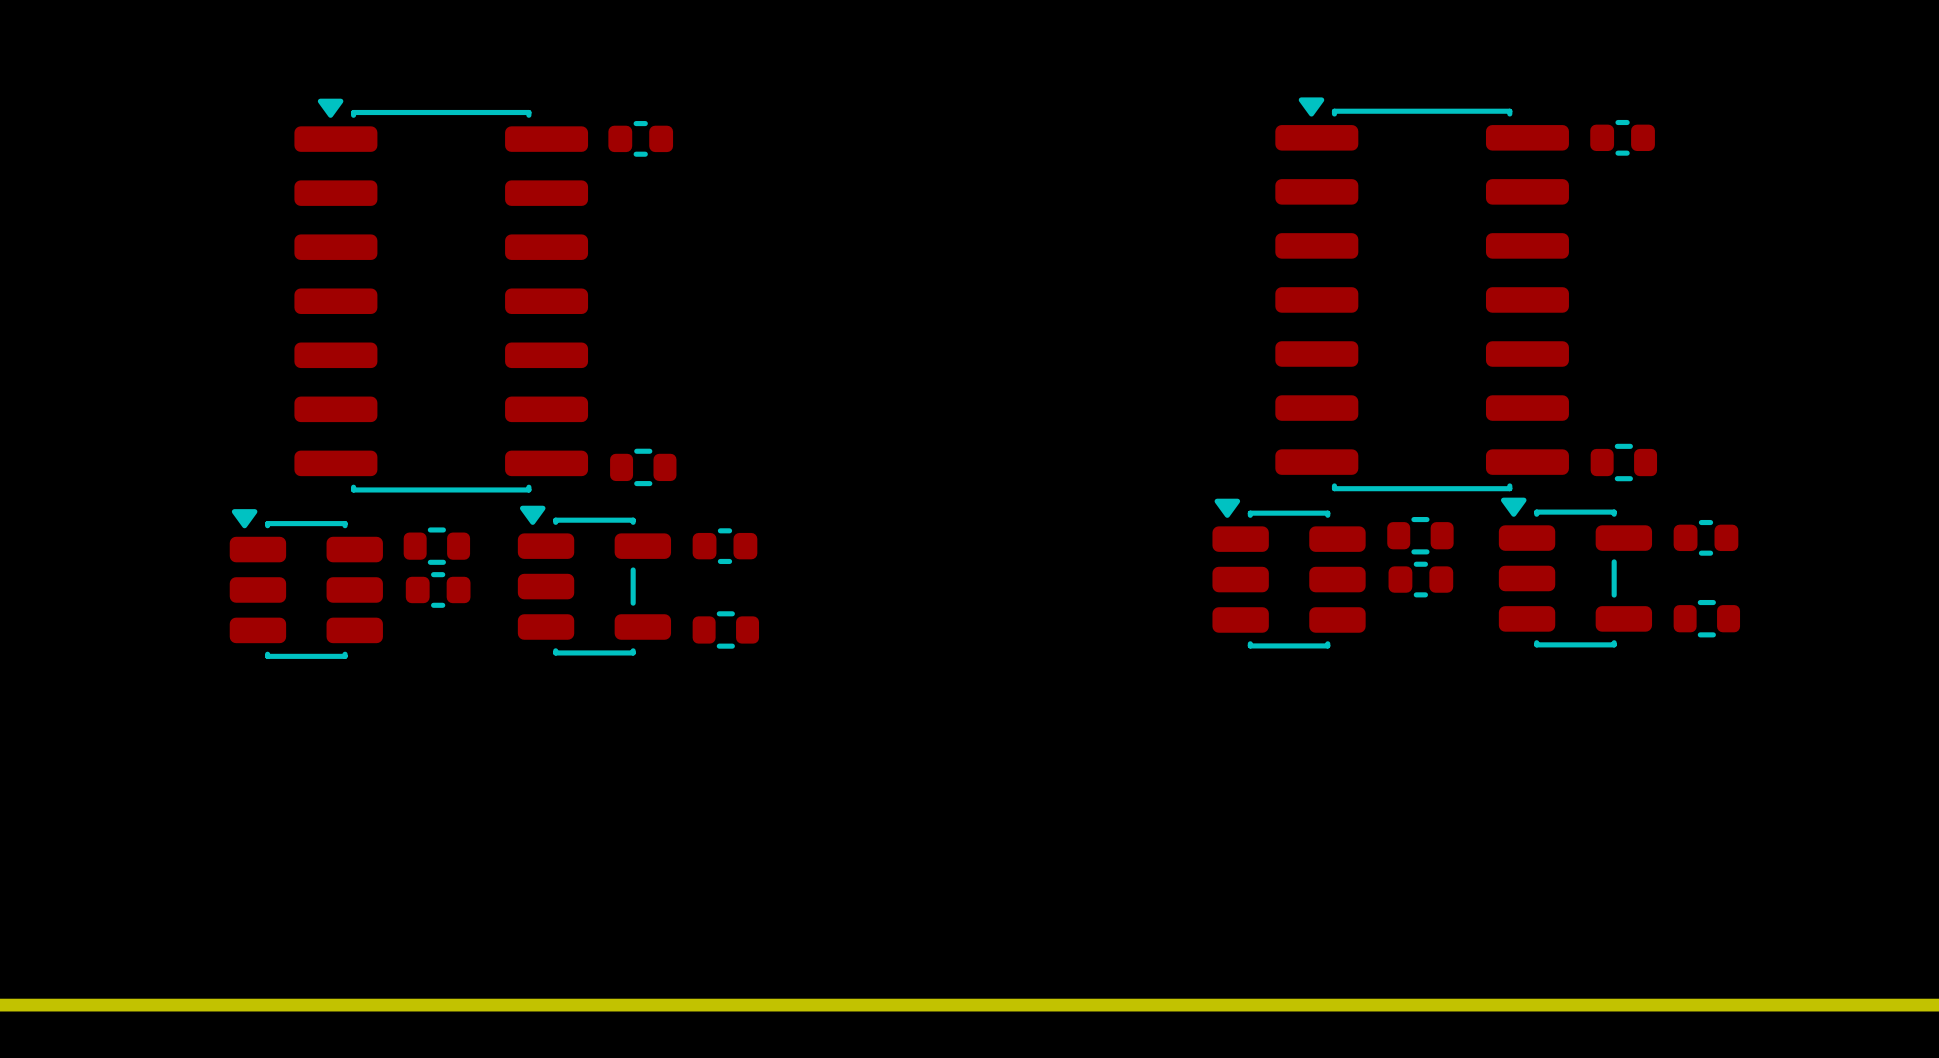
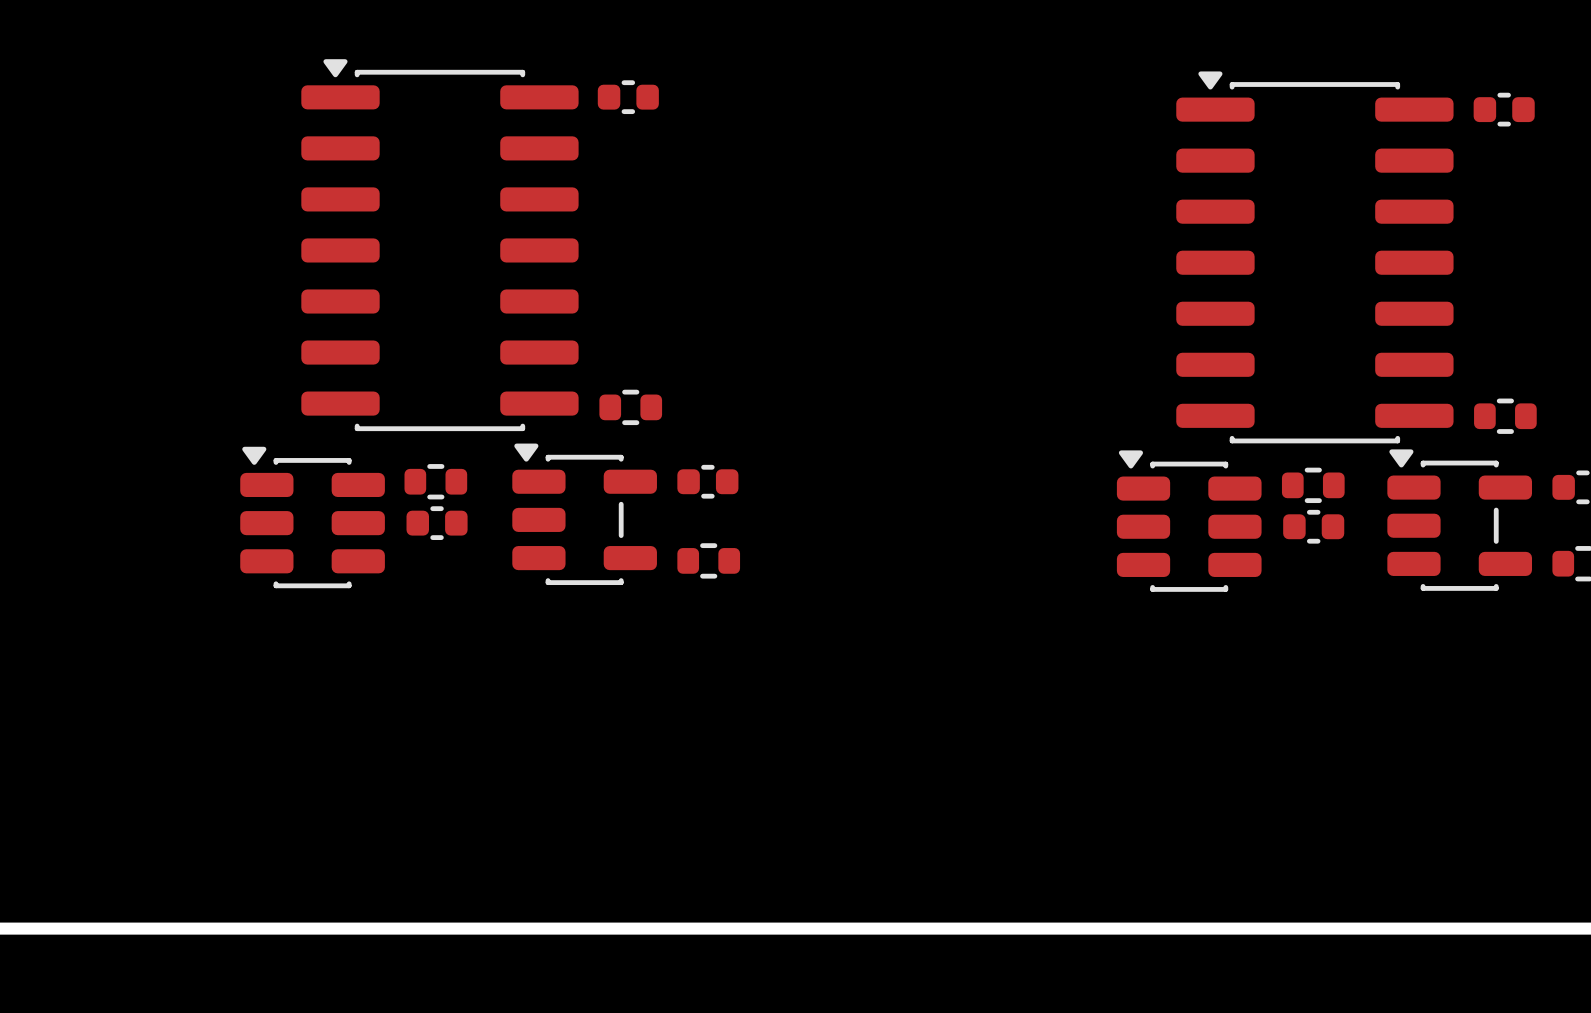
part position: (640, 138) -> (628, 97)
part position: (441, 295) -> (439, 245)
part position: (643, 467) -> (630, 407)
part position: (436, 546) -> (435, 481)
part position: (724, 546) -> (707, 481)
part position: (594, 580) -> (584, 514)
part position: (306, 584) -> (312, 517)
part position: (438, 589) -> (437, 523)
part position: (725, 629) -> (708, 560)

